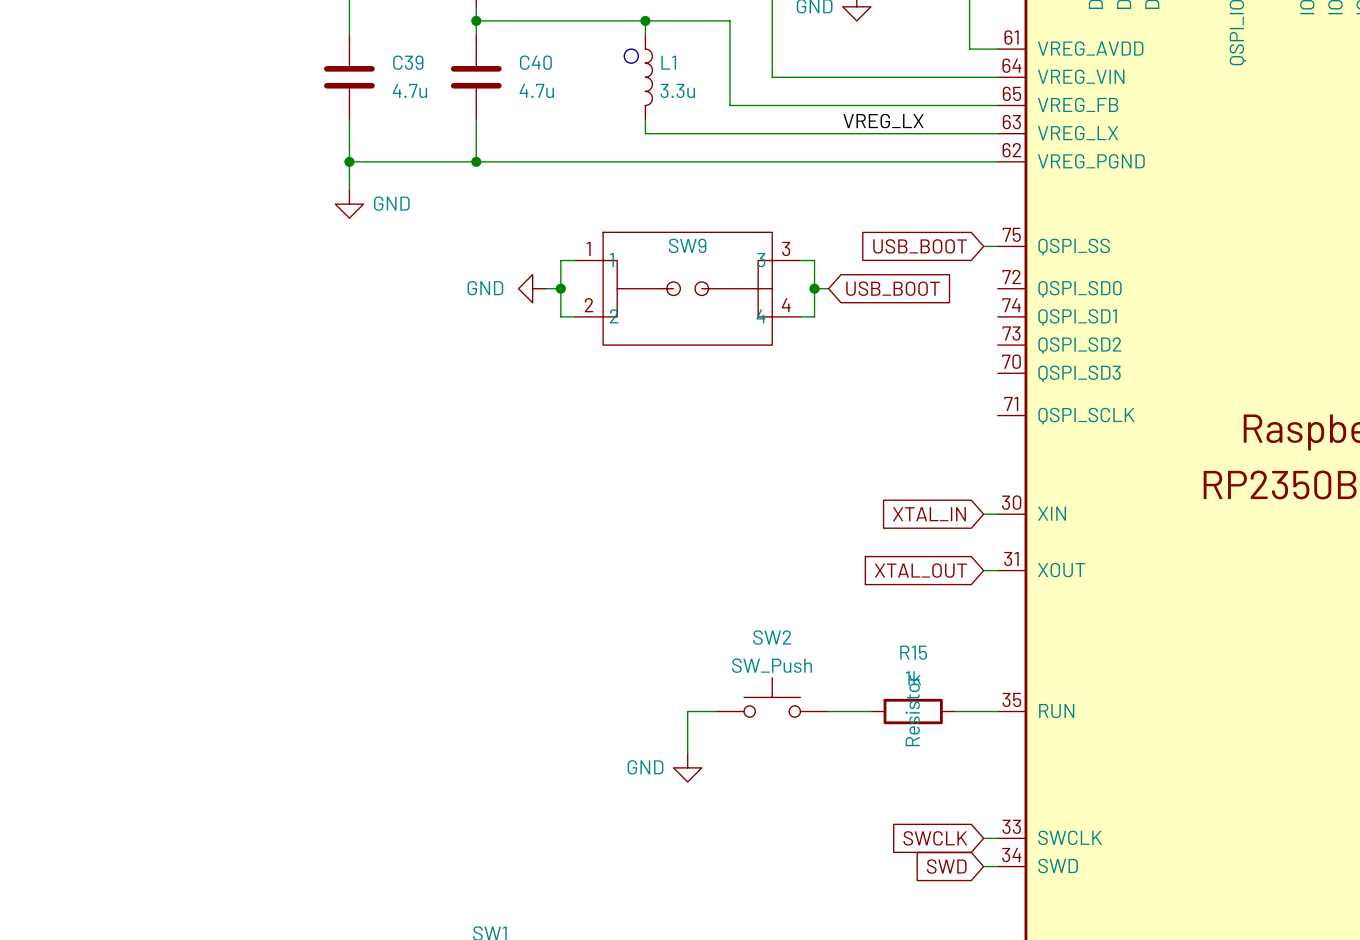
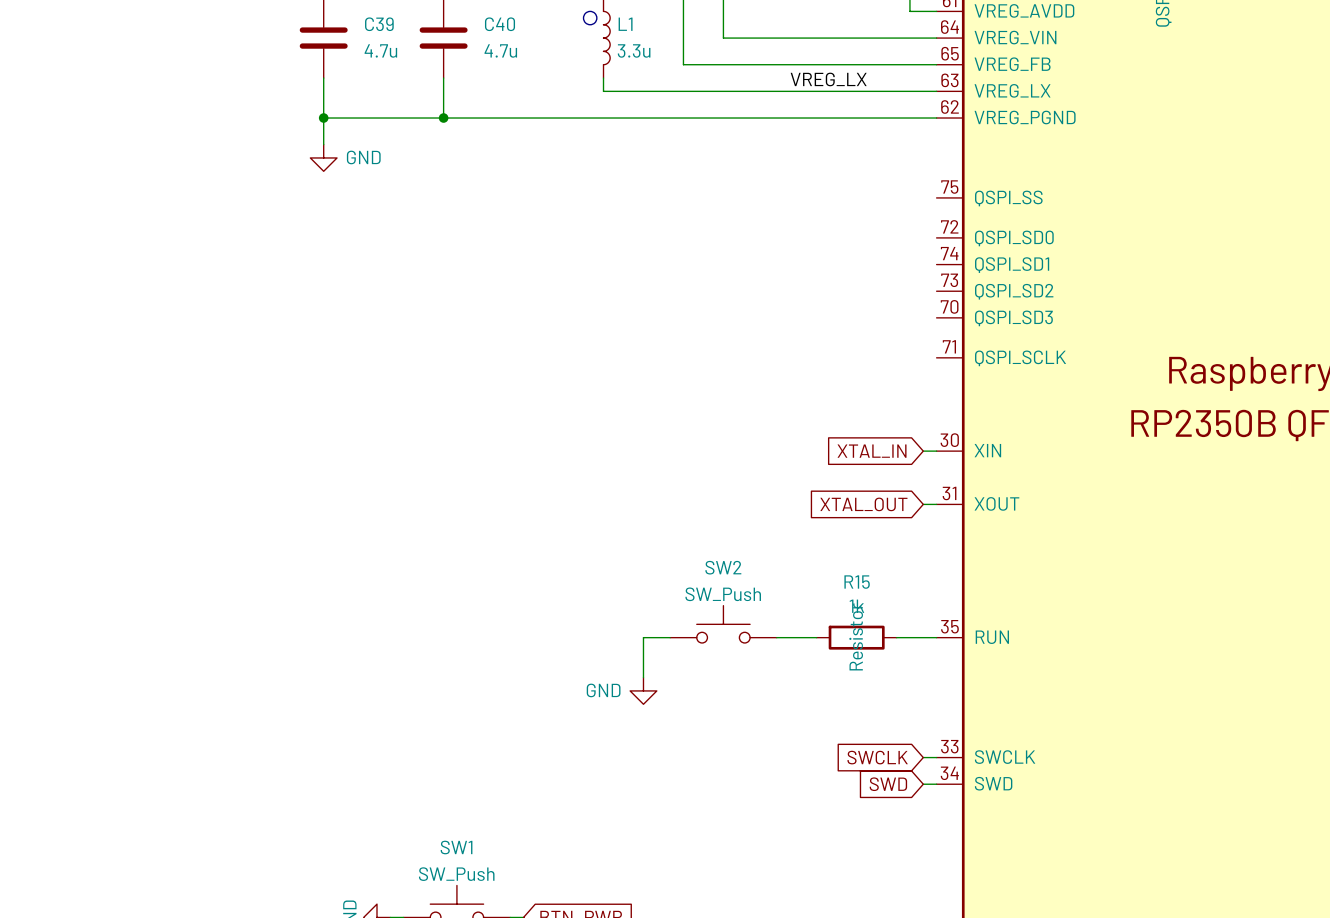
global label: USB_BOOT (920, 246) -> none
wire: (983, 246) (997, 246) -> none
wire: (574, 260) (560, 260) (560, 316) (574, 316) -> none
wire: (800, 260) (814, 260) (814, 316) (800, 316) -> none
power symbol: GND (532, 288) -> none
wire: (546, 288) (560, 288) -> none
junction: (560, 288) -> none
SW9: (687, 288) -> none
wire: (814, 288) (828, 288) -> none
junction: (814, 288) -> none
global label: USB_BOOT (893, 288) -> none

